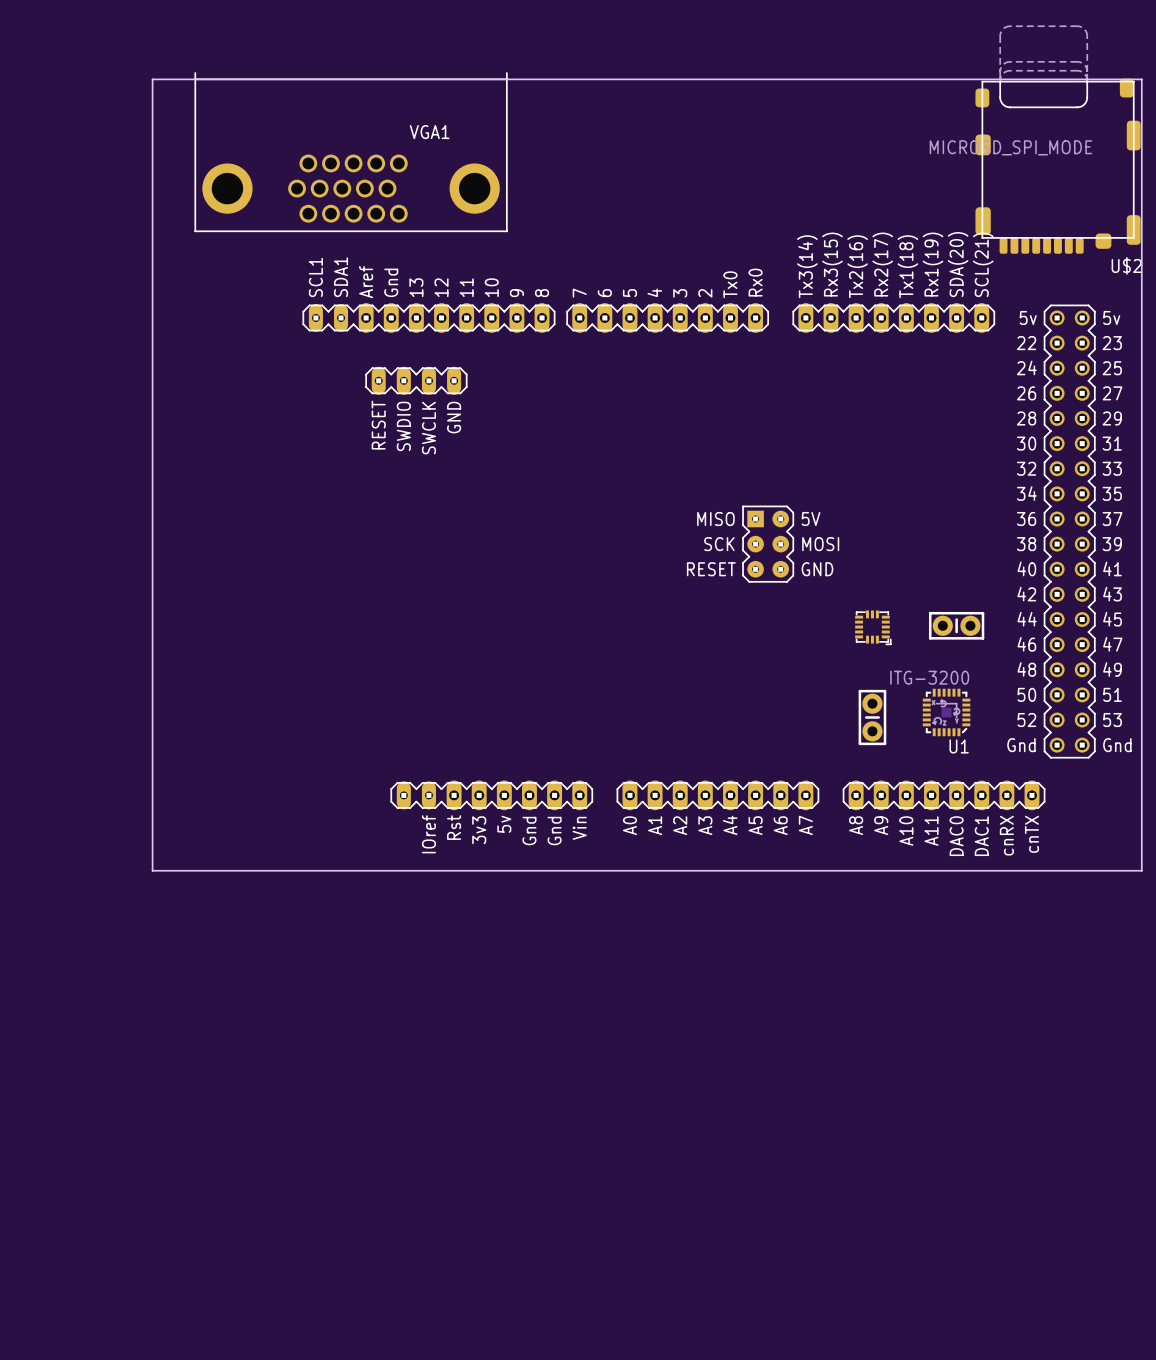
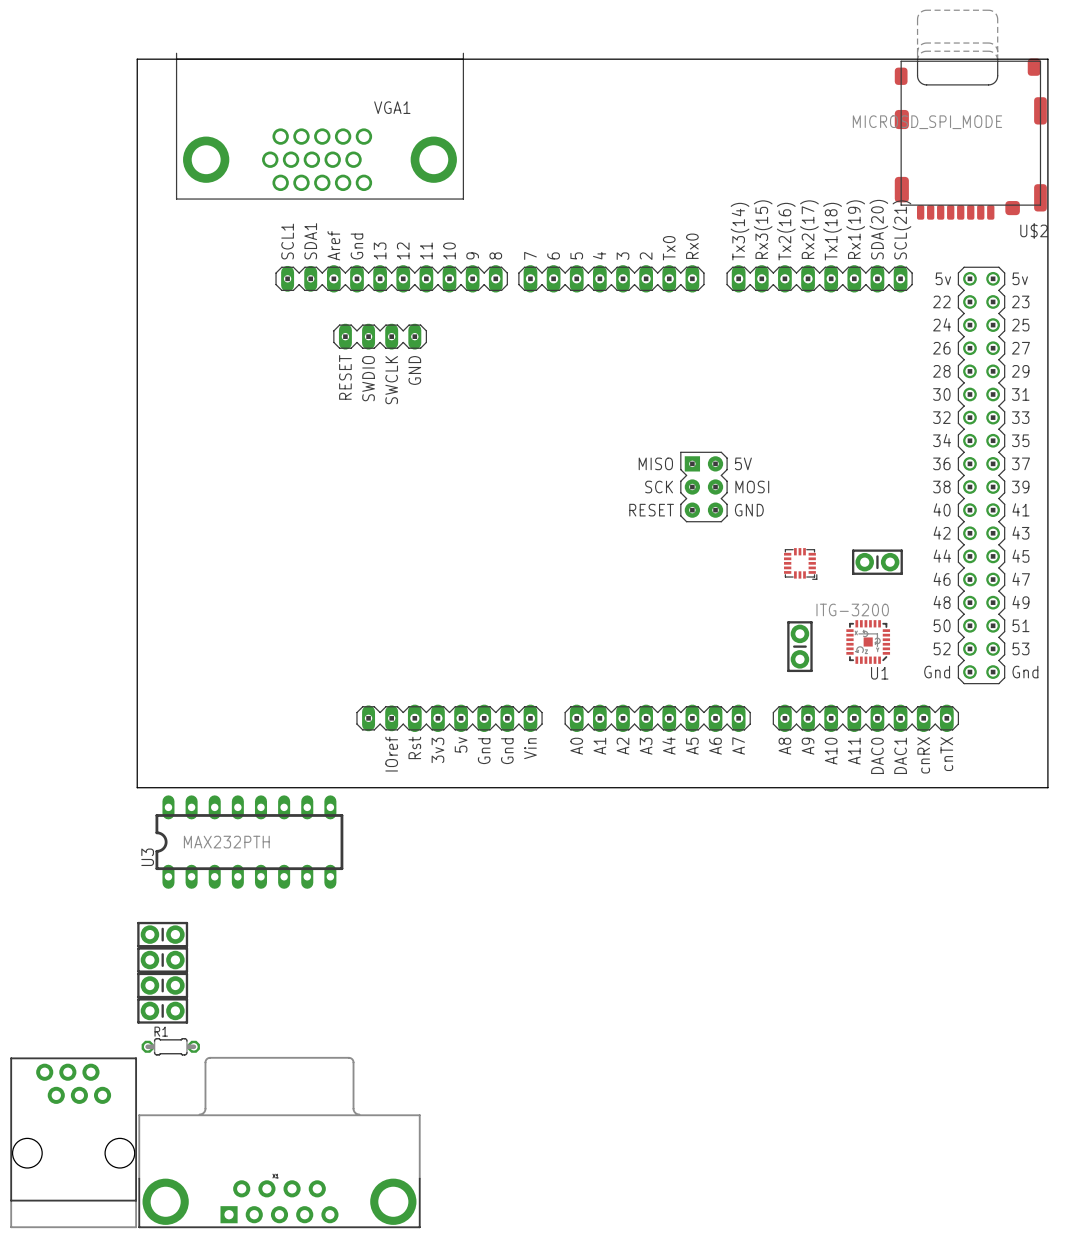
U3: none -> MAX232PTH (249, 842)
part: none -> (162, 934)
part: none -> (162, 960)
part: none -> (162, 985)
part: none -> (162, 1010)
R1: none -> (170, 1046)
part: none -> (73, 1142)
part: none -> (279, 1142)

